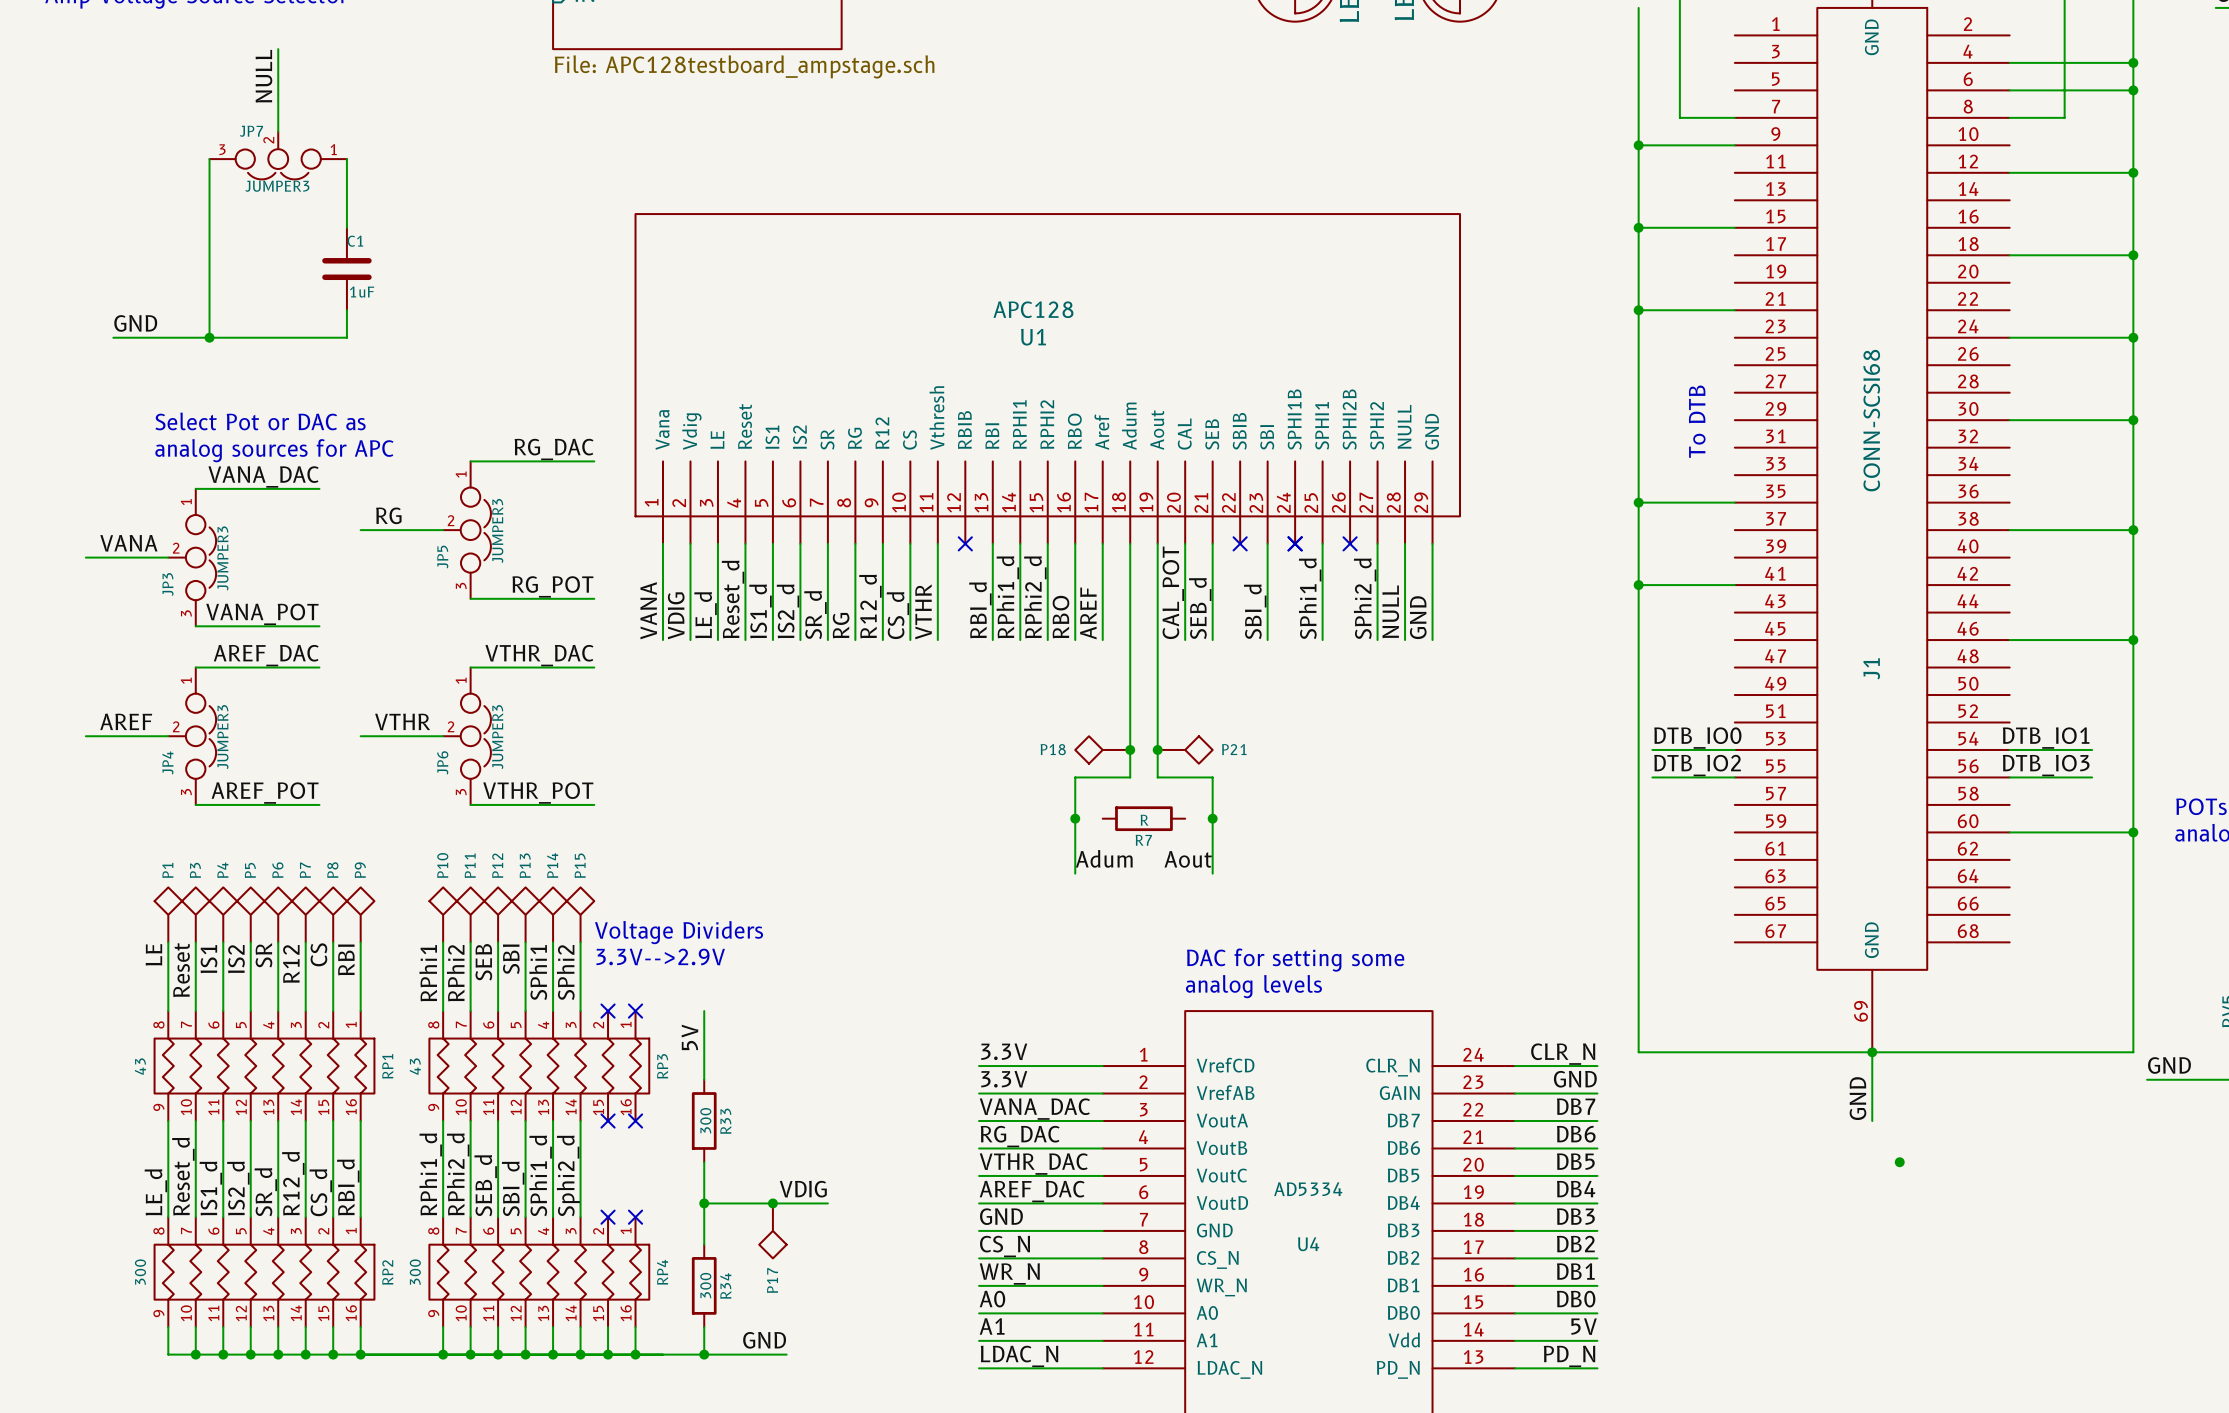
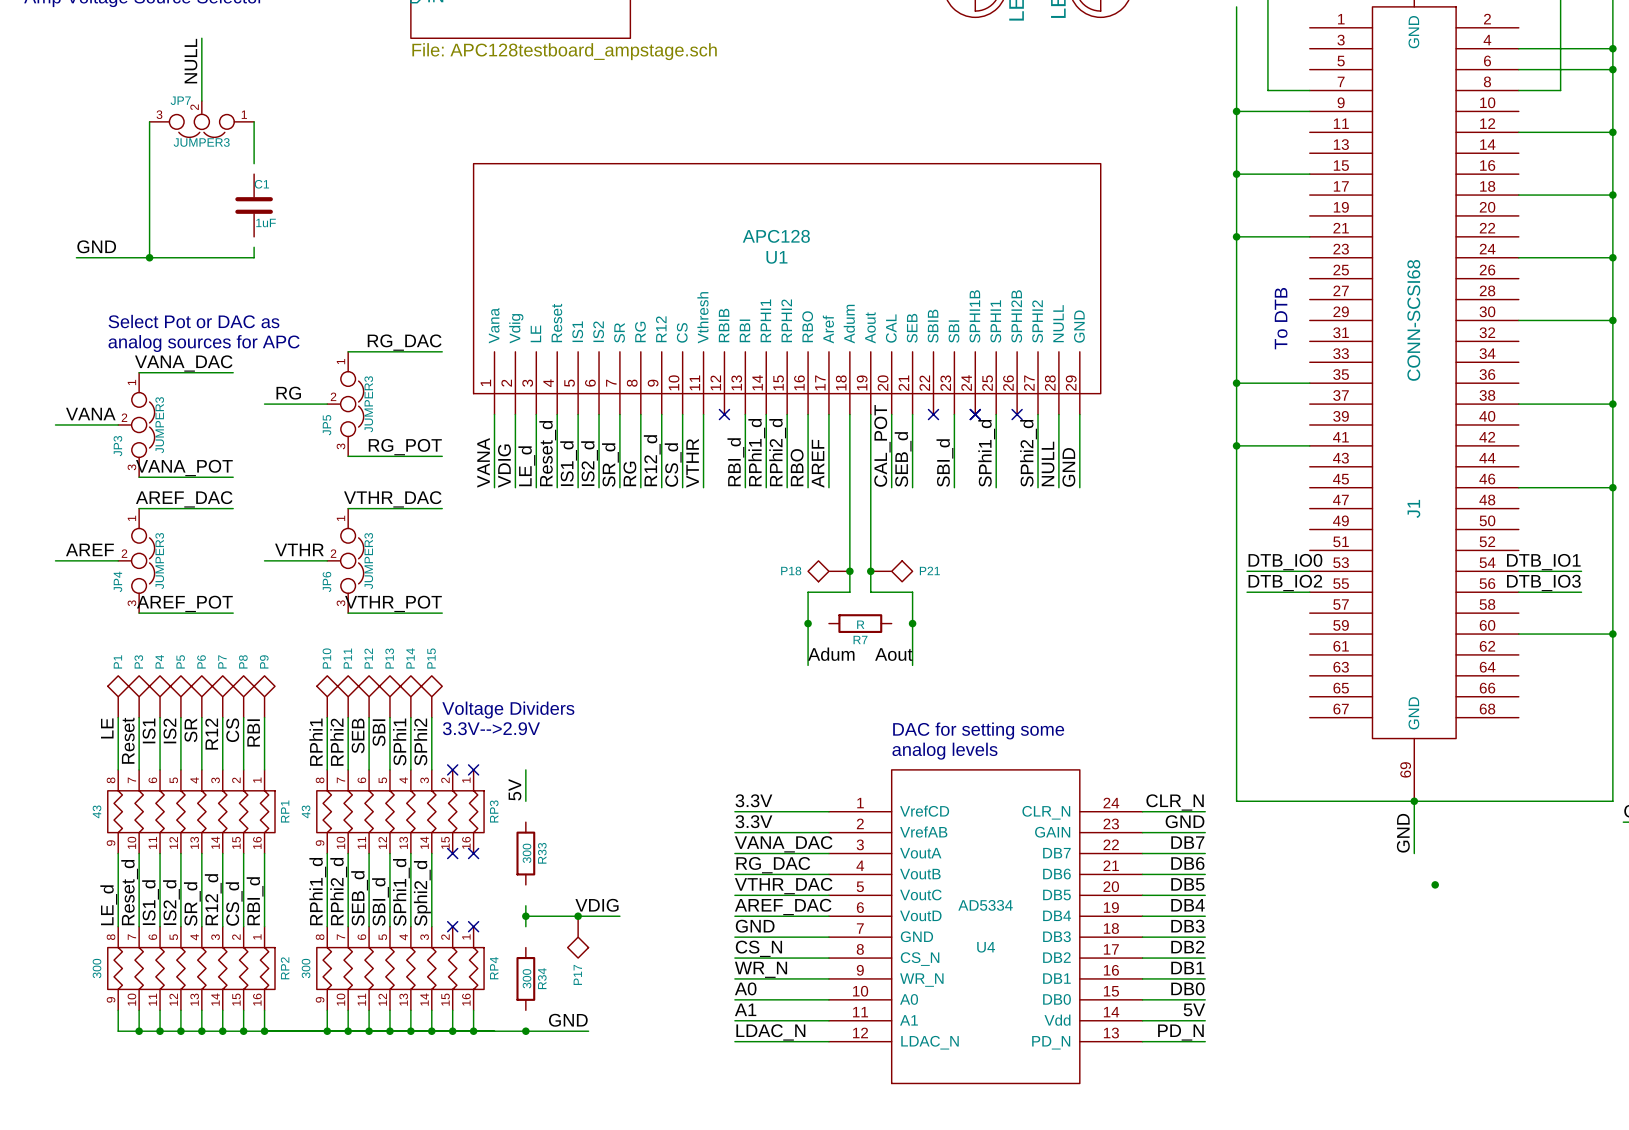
wire: (346, 214) (346, 227) -> none
wire: (346, 310) (346, 323) -> none
wire: (704, 1052) (704, 1079) -> none
wire: (704, 1162) (704, 1189) -> none
wire: (704, 1217) (704, 1244) -> none
wire: (704, 1327) (704, 1354) -> none

